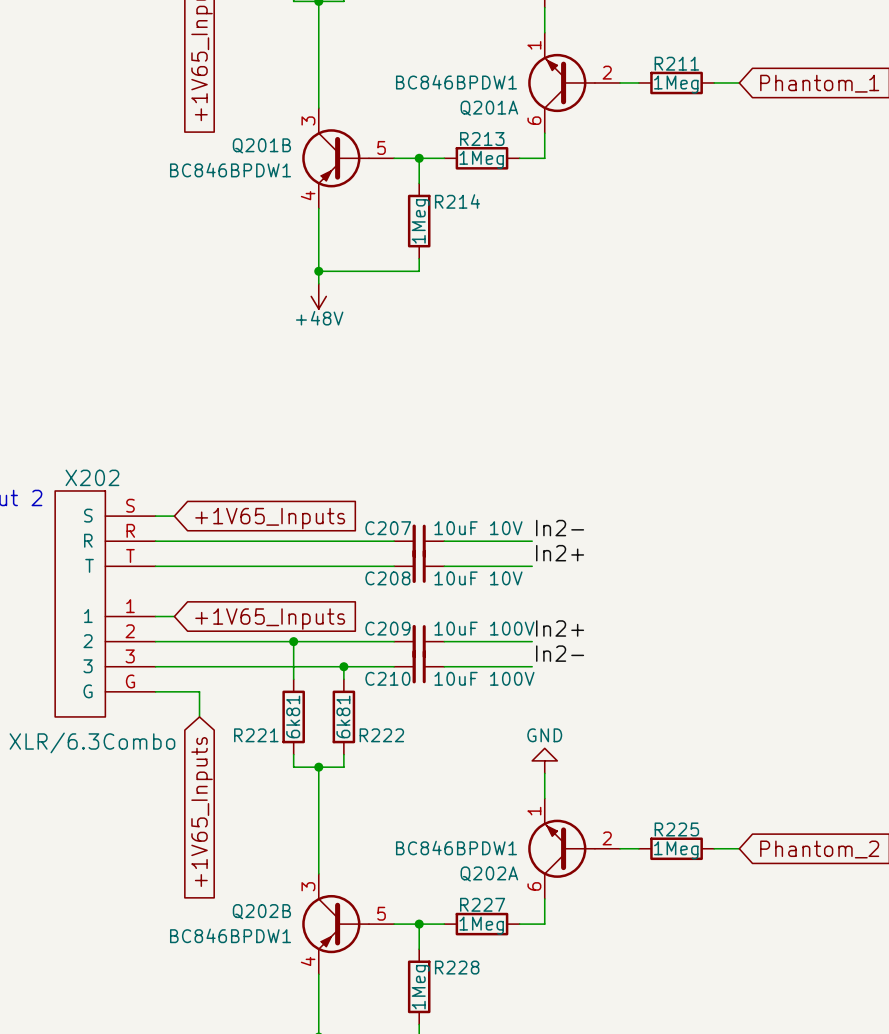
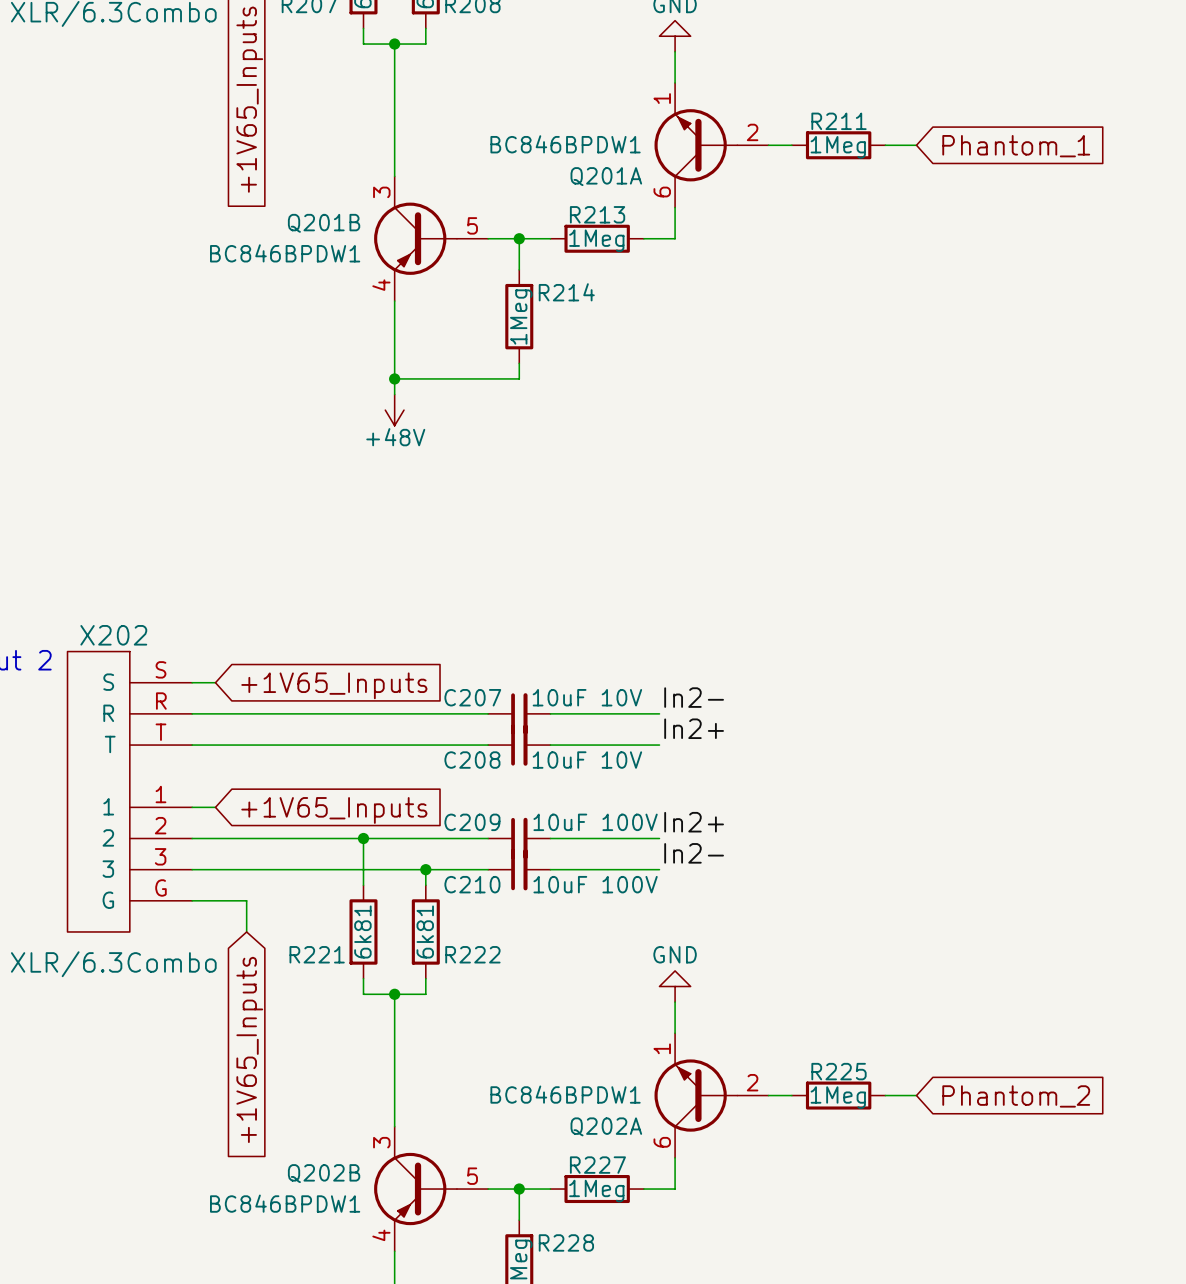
C207 rotation: 0° (419, 541) -> 180° (519, 713)
C208 rotation: 0° (419, 566) -> 180° (519, 745)
C209 rotation: 0° (419, 641) -> 180° (519, 838)
C210 rotation: 0° (419, 666) -> 180° (519, 869)

